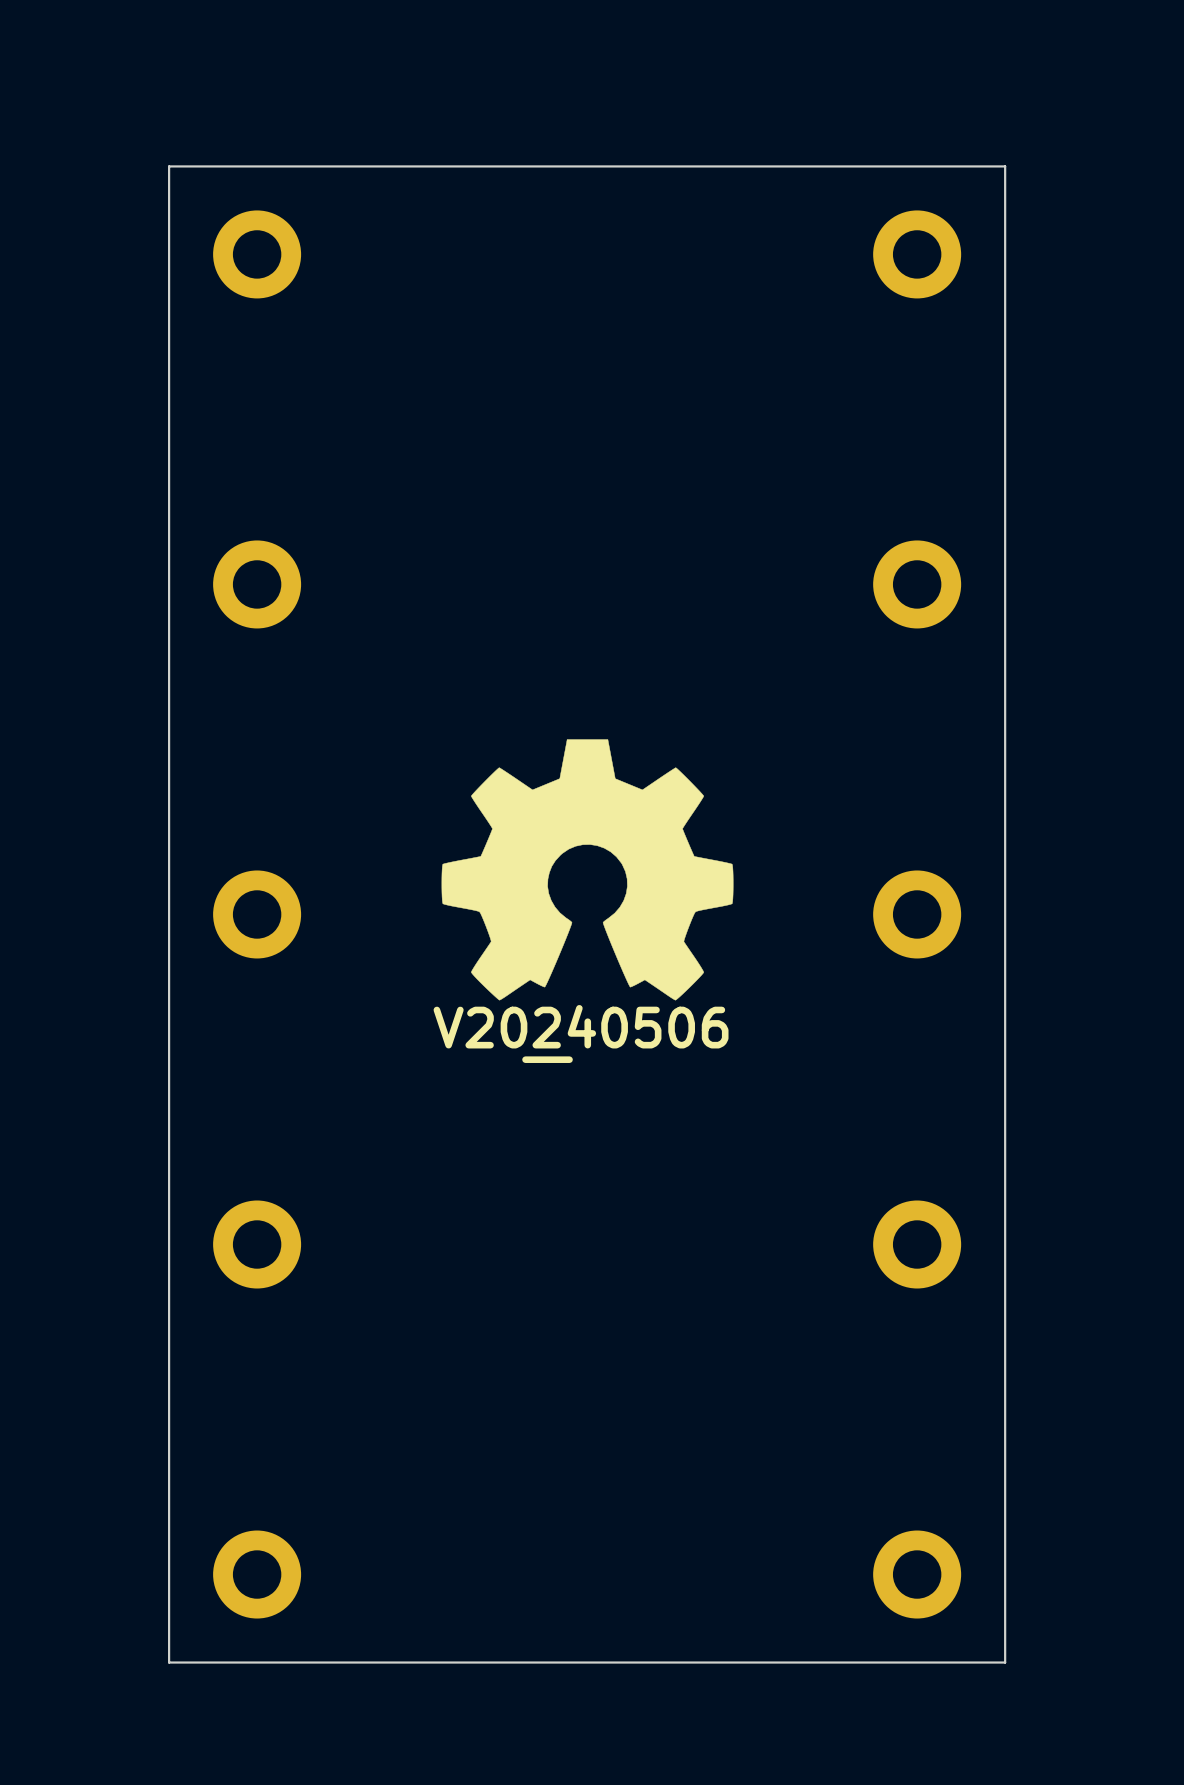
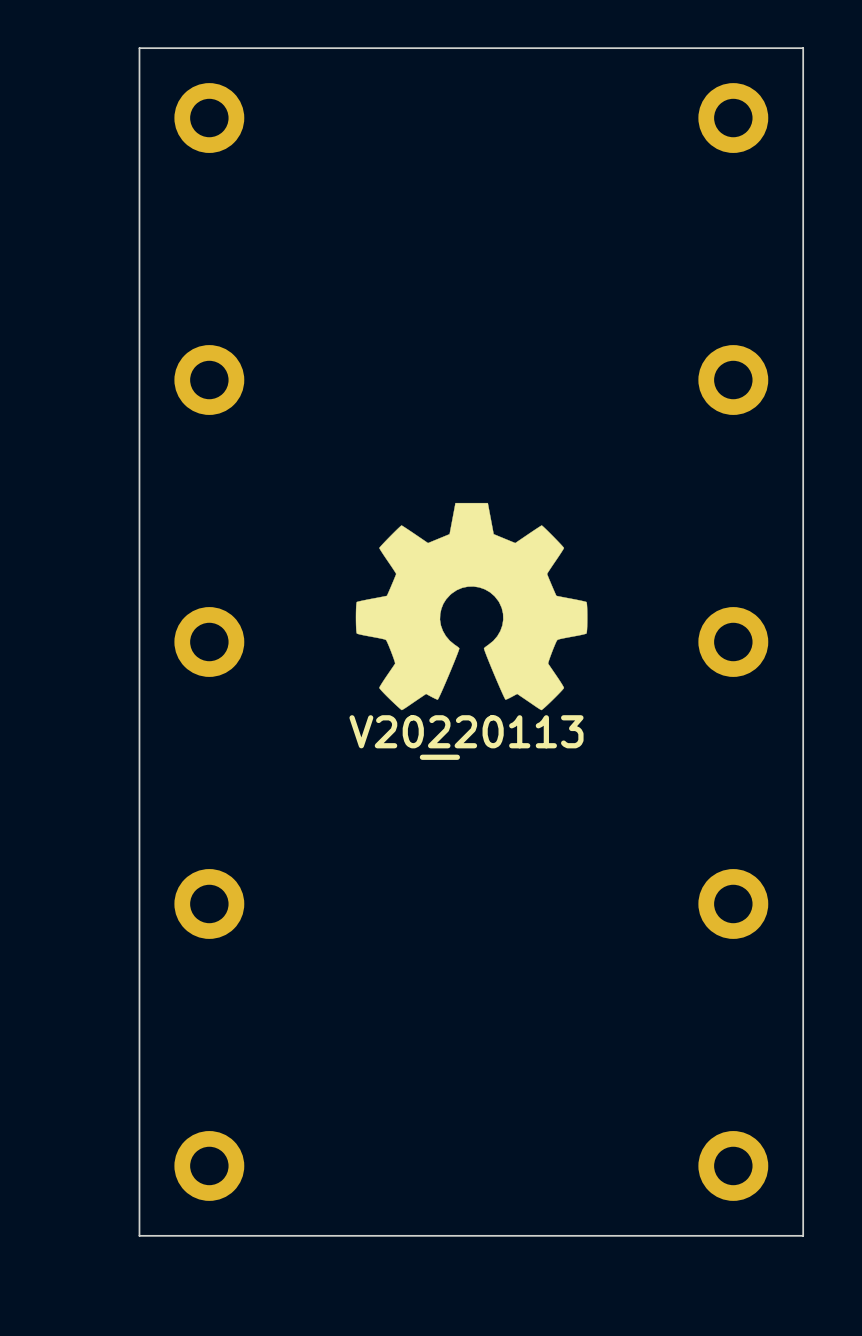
drawing shape: [433, 1004, 729, 1063] -> [349, 715, 584, 760]

